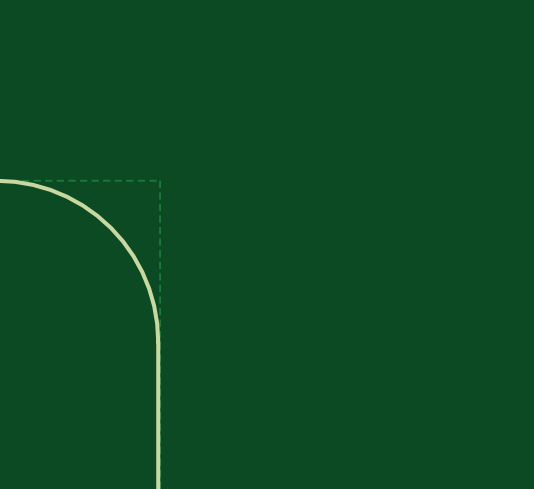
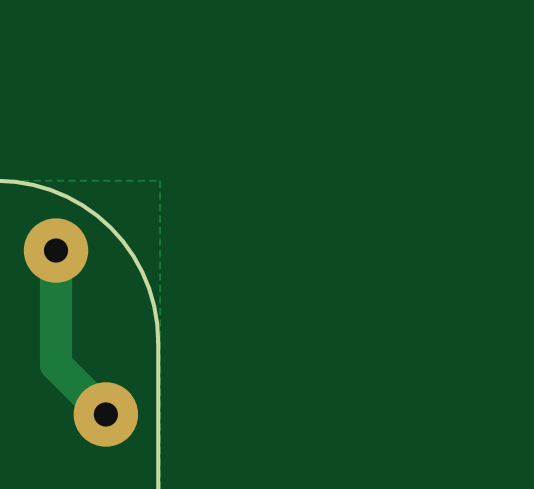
track: none -> (56, 250) (56, 364) (105, 414)
via: none -> (56, 250)
via: none -> (105, 414)

